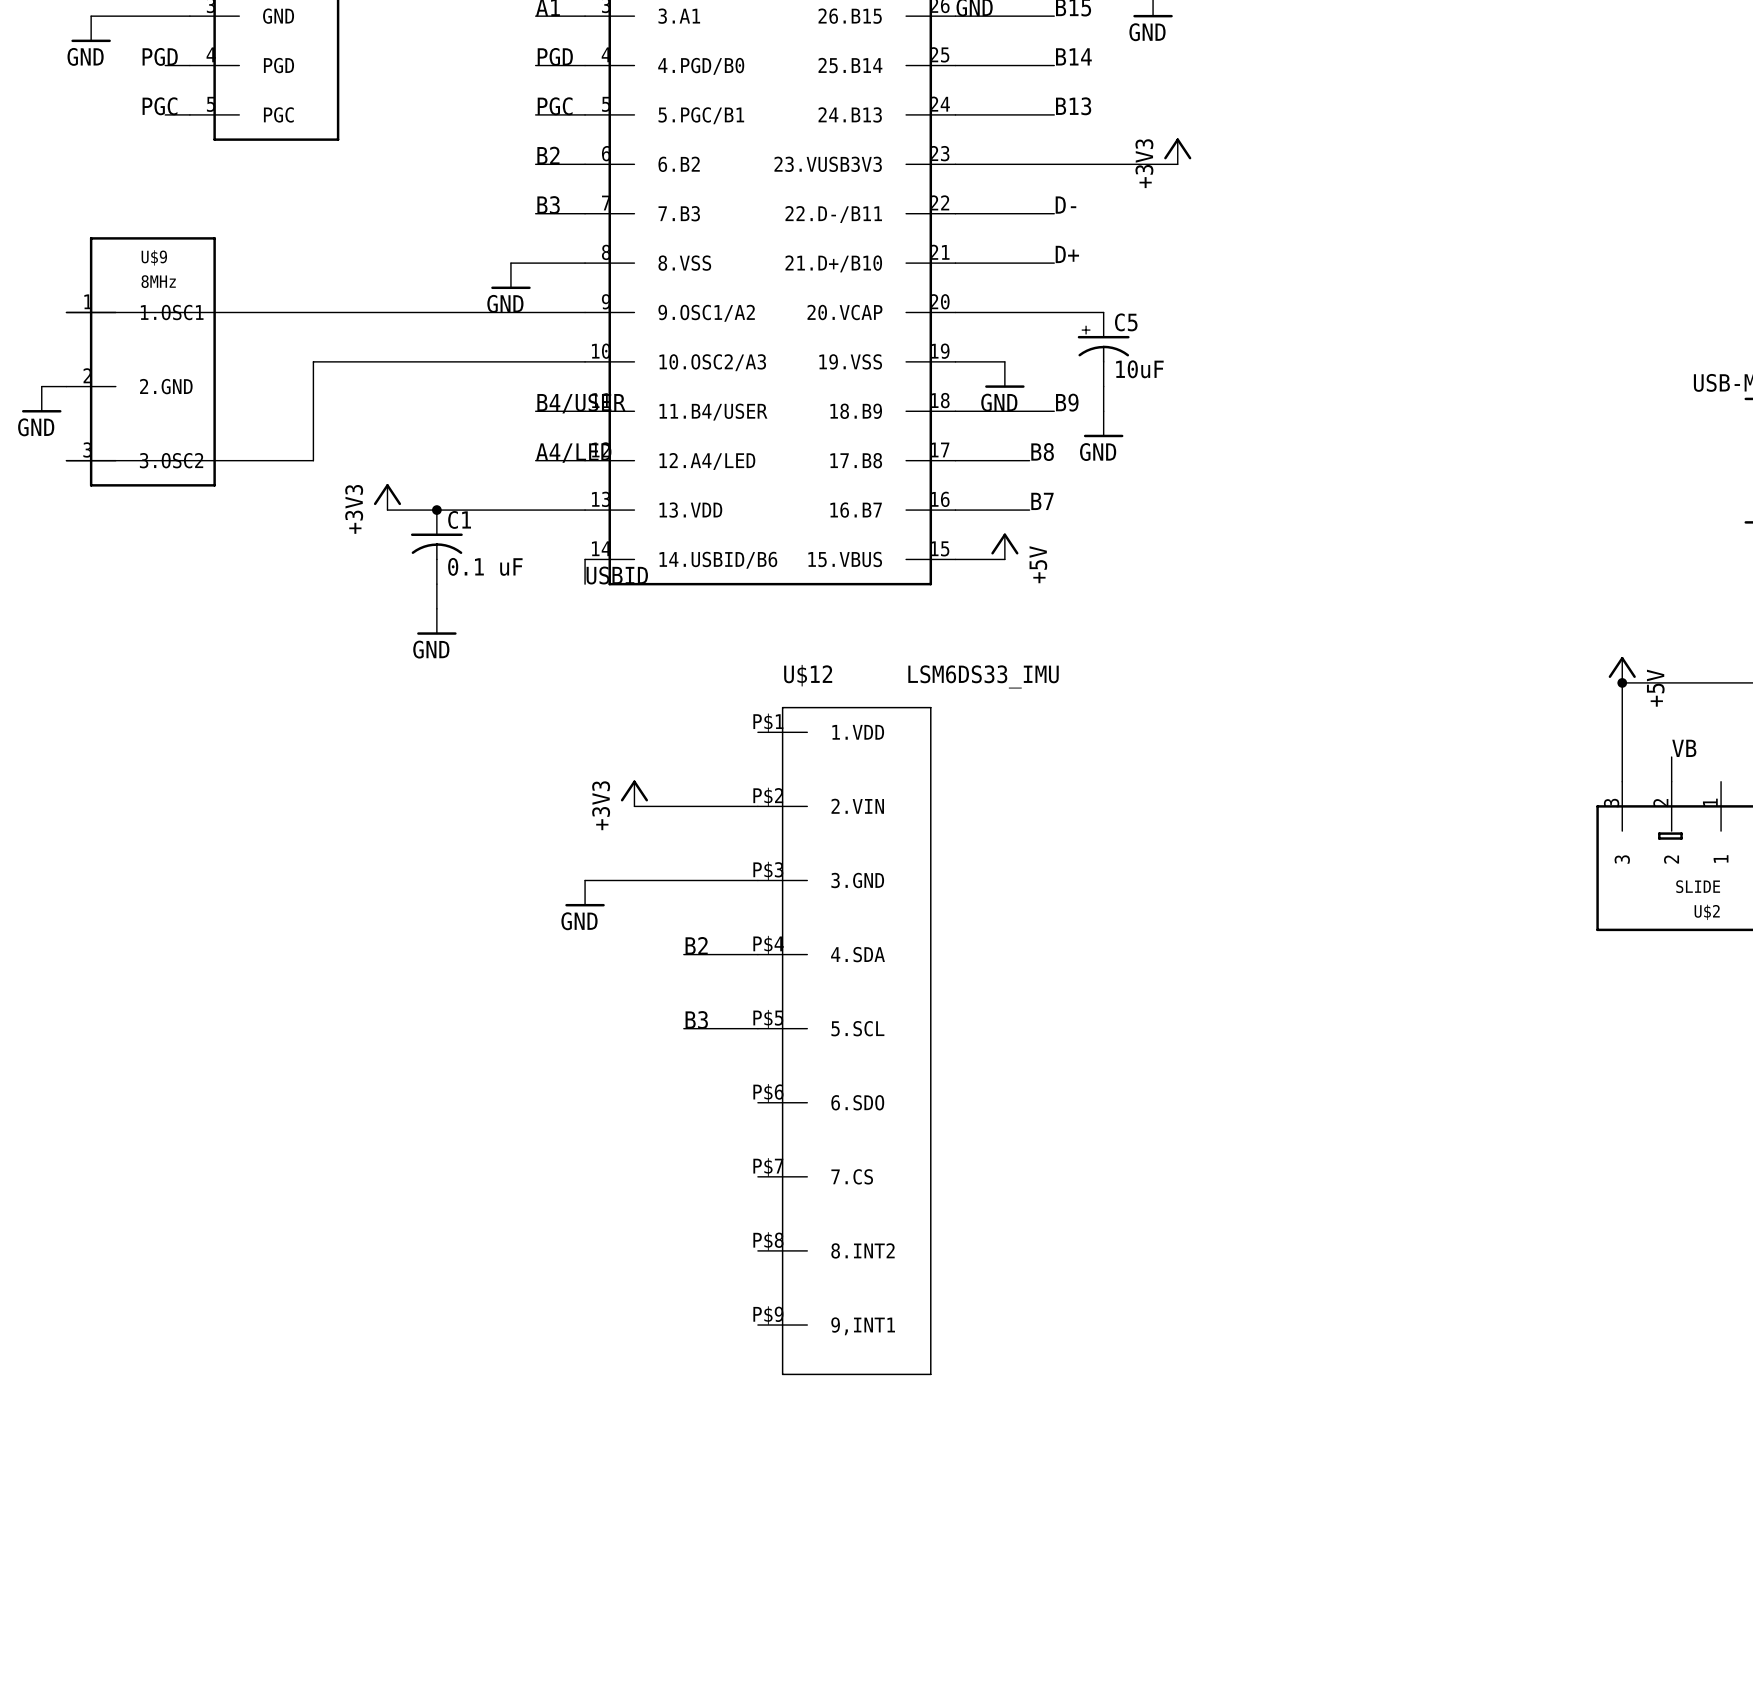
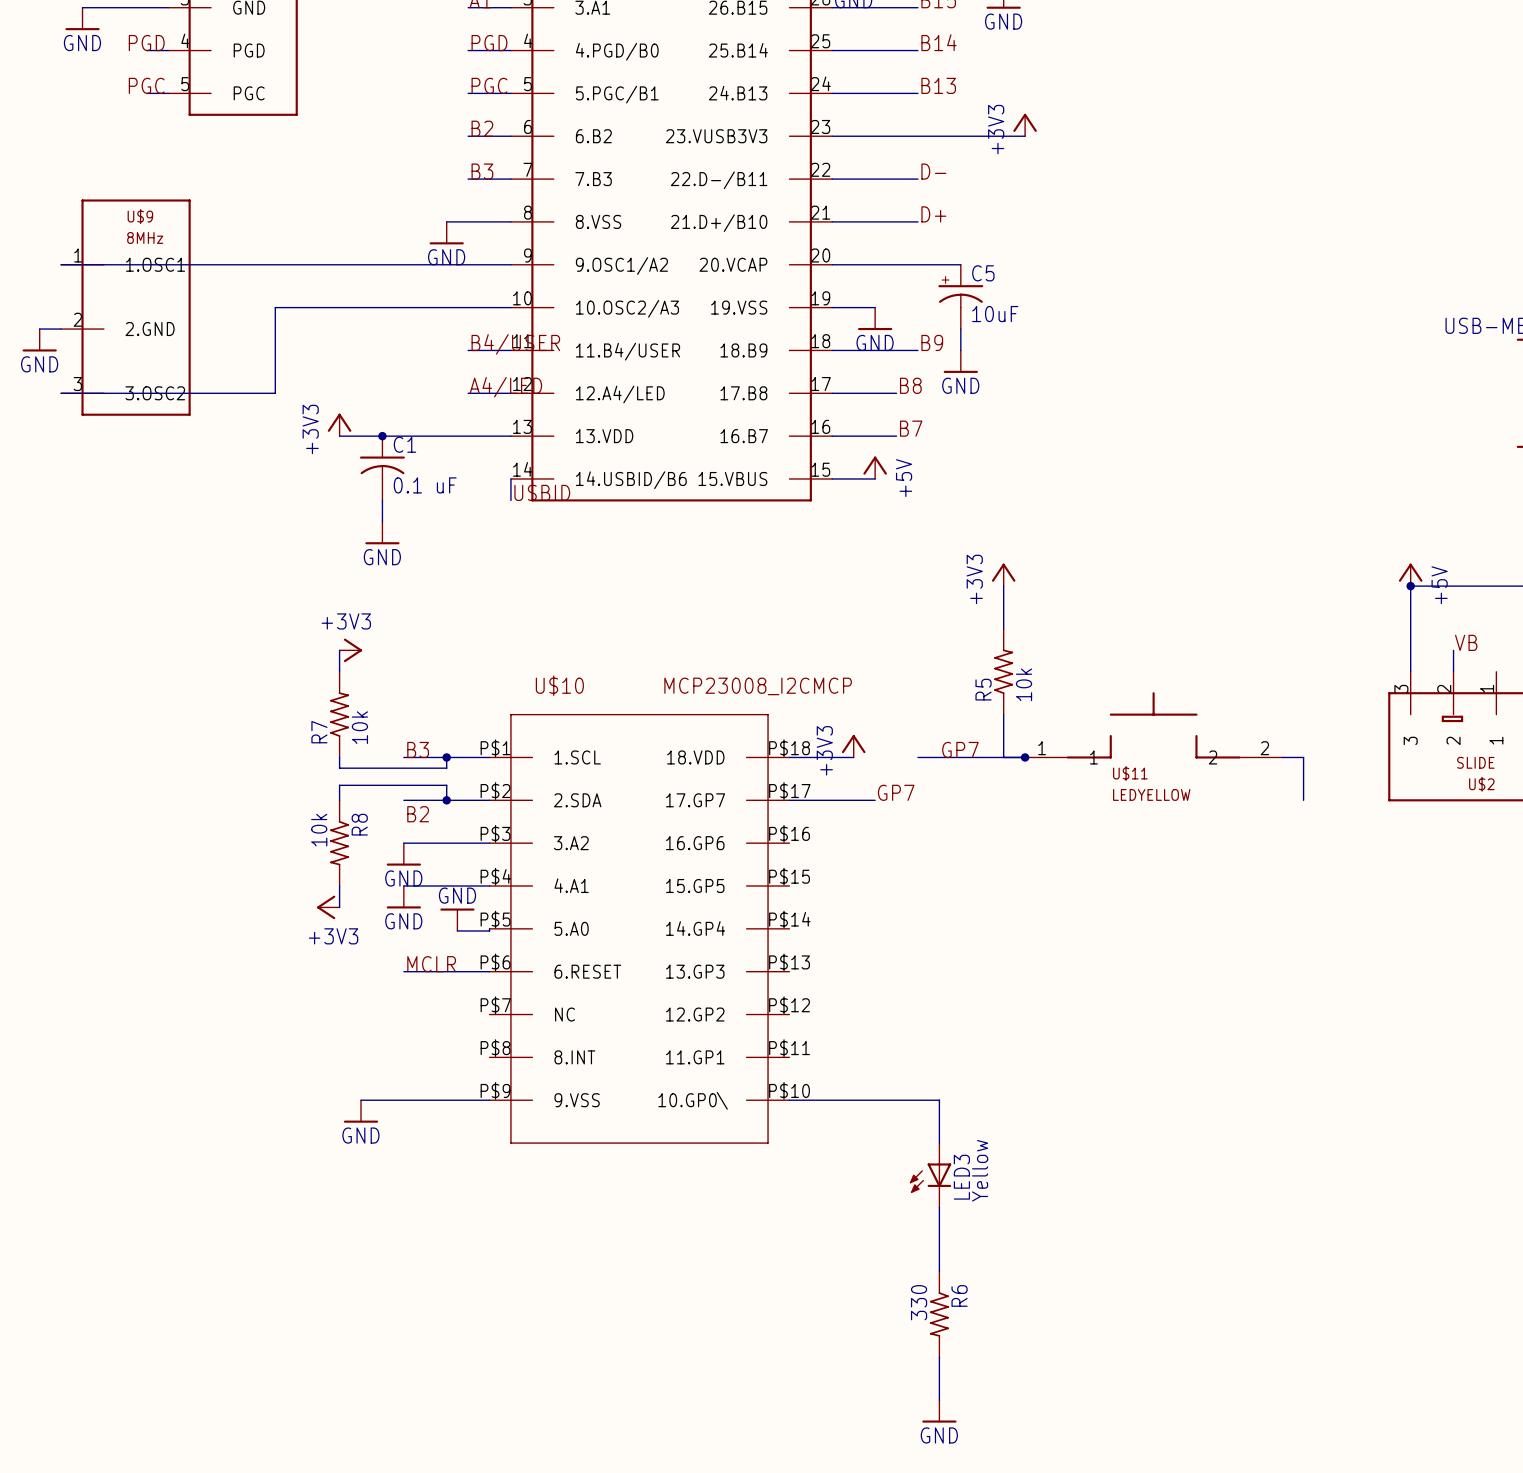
power symbol: none -> +3V3 (1003, 574)
wire: none -> (1003, 586) (1003, 628)
wire: none -> (339, 650) (339, 671)
power symbol: none -> +3V3 (350, 650)
R5: none -> 10k (1003, 671)
power symbol: +3V3 (634, 793) -> none
wire: (634, 806) (757, 806) -> none
R7: none -> 10k (339, 714)
wire: none -> (1003, 714) (1003, 757)
U$11: none -> LEDYELLOW (1153, 725)
power symbol: none -> +3V3 (853, 746)
label: none -> B3 (418, 749)
label: none -> GP7 (960, 749)
wire: none -> (339, 757) (339, 768) (446, 768) (446, 757)
wire: none -> (403, 757) (489, 757)
junction: none -> (446, 757)
wire: (585, 880) (757, 880) -> none
wire: none -> (917, 757) (1025, 757)
junction: none -> (1025, 757)
wire: none -> (1282, 757) (1303, 757) (1303, 800)
power symbol: GND (585, 893) -> none
label: none -> GP7 (896, 792)
wire: none -> (339, 800) (339, 785) (446, 785) (446, 800)
wire: none -> (403, 800) (489, 800)
junction: none -> (446, 800)
wire: none -> (789, 800) (875, 800)
label position: B2 (696, 945) -> B2 (418, 814)
wire: (683, 954) (757, 954) -> (789, 757) (853, 757)
R8: none -> 10k (339, 843)
wire: none -> (403, 843) (489, 843)
power symbol: none -> GND (403, 854)
label: B3 (696, 1020) -> none
wire: none -> (339, 886) (339, 907)
wire: none -> (403, 886) (489, 886)
wire: (683, 1028) (757, 1028) -> none
power symbol: none -> GND (403, 897)
U$12: LSM6DS33_IMU (844, 1041) -> none
power symbol: none -> +3V3 (328, 907)
power symbol: none -> GND (457, 919)
wire: none -> (489, 928) (489, 930) (457, 930)
U$10: none -> MCP23008_I2CMCP (639, 928)
label: none -> MCLR (431, 964)
wire: none -> (403, 971) (489, 971)
wire: none -> (361, 1100) (489, 1100)
wire: none -> (789, 1100) (939, 1100) (939, 1143)
power symbol: none -> GND (361, 1111)
LED3: none -> Yellow (930, 1175)
wire: none -> (939, 1207) (939, 1271)
R6: none -> 330 (939, 1314)
wire: none -> (939, 1357) (939, 1400)
power symbol: none -> GND (939, 1411)

